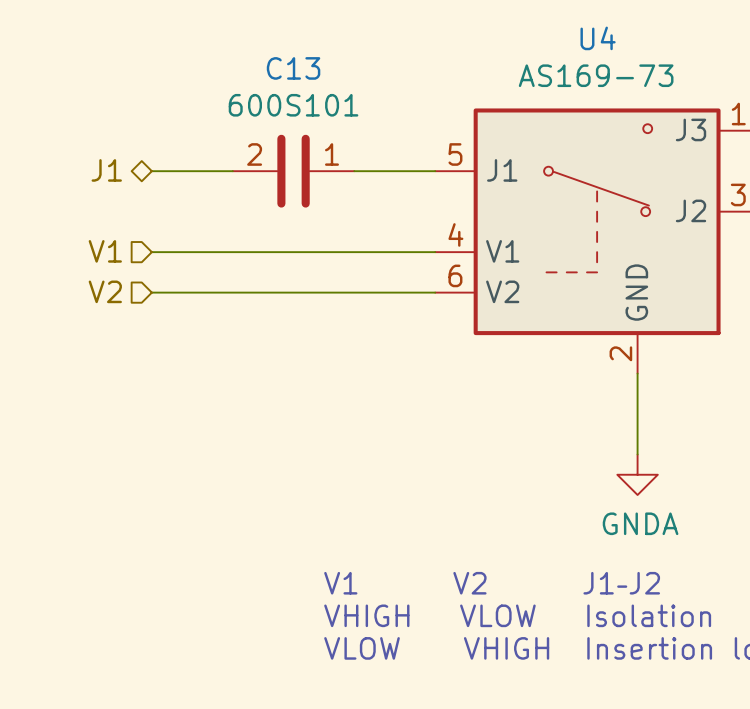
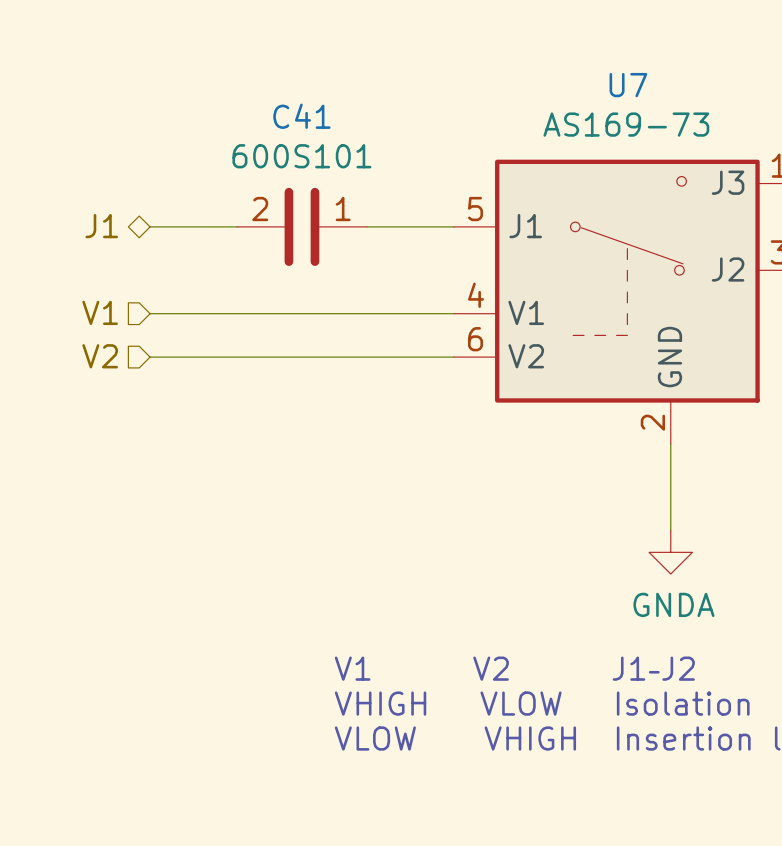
U4 name: U4 (598, 38) -> U7 (628, 85)
C13 name: C13 (293, 68) -> C41 (301, 116)

